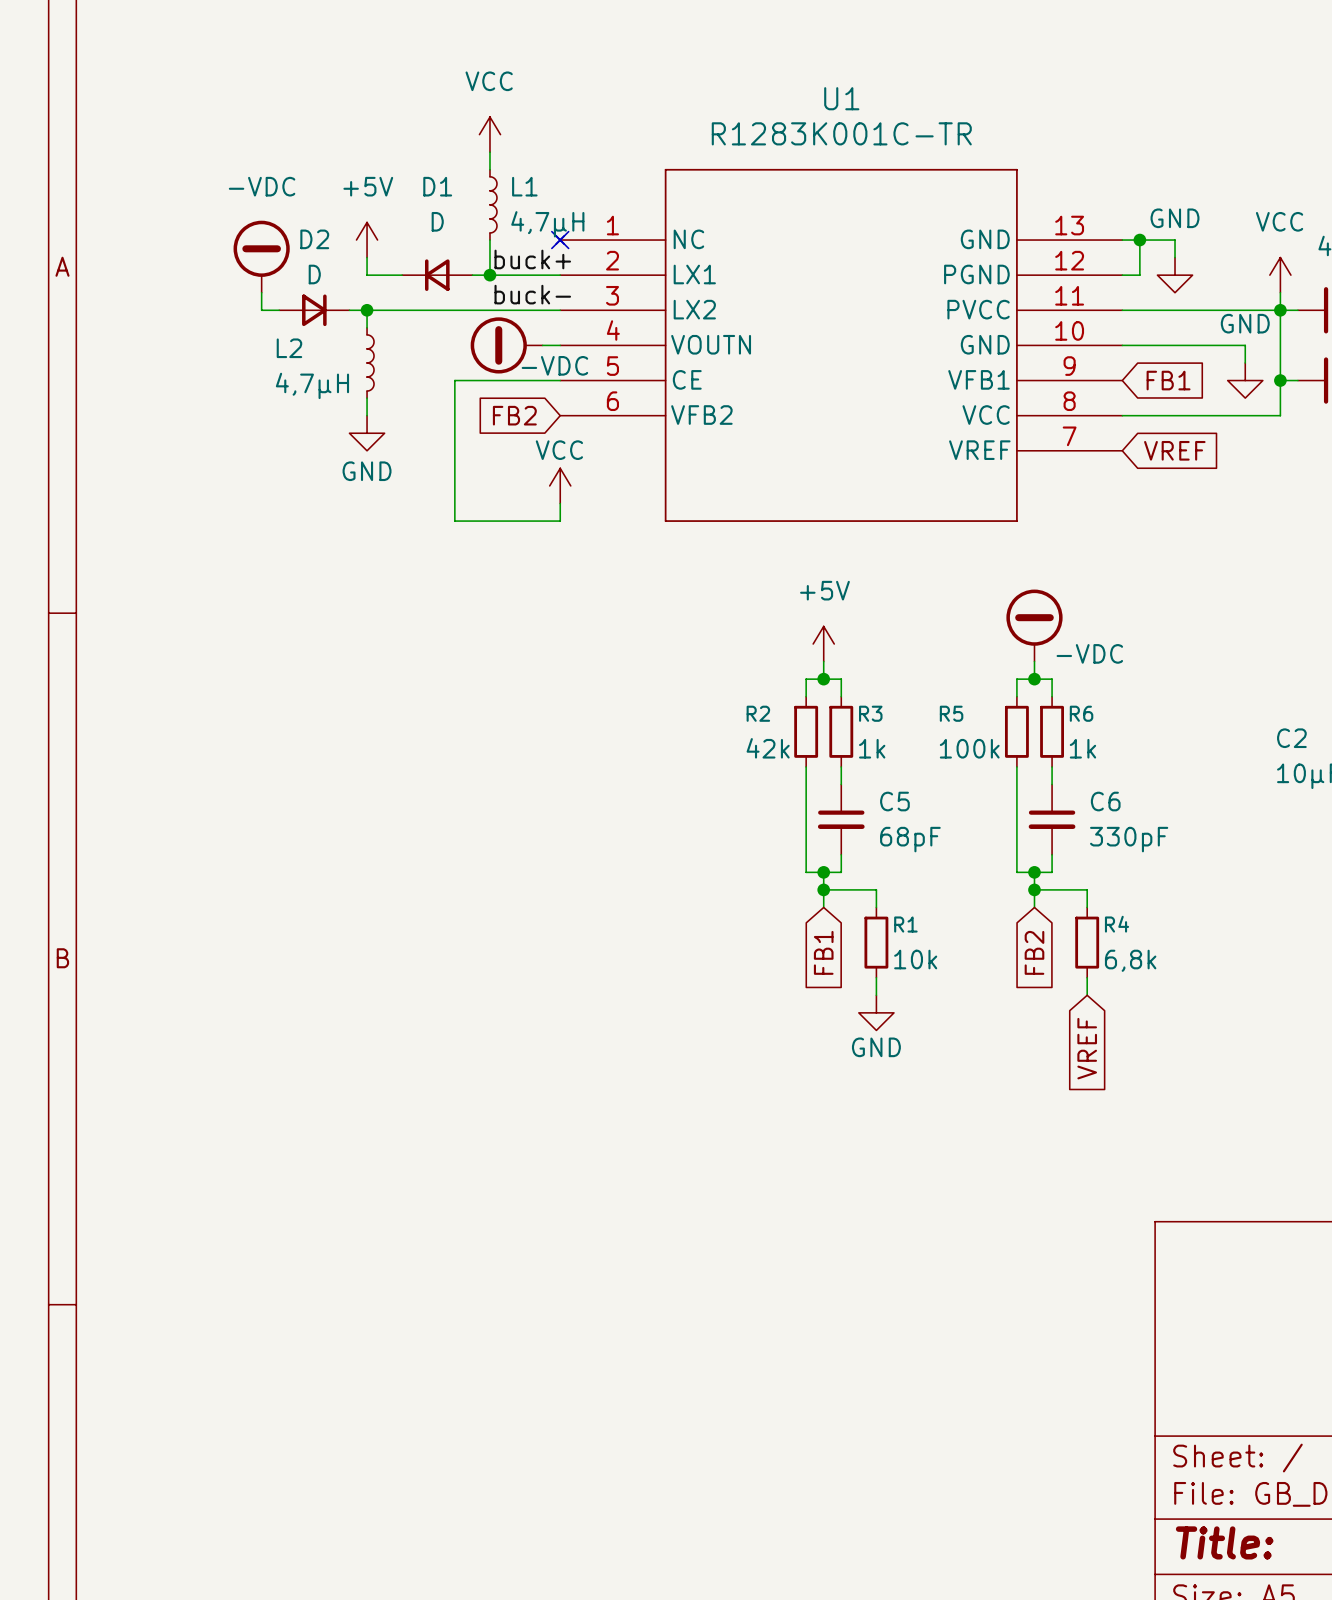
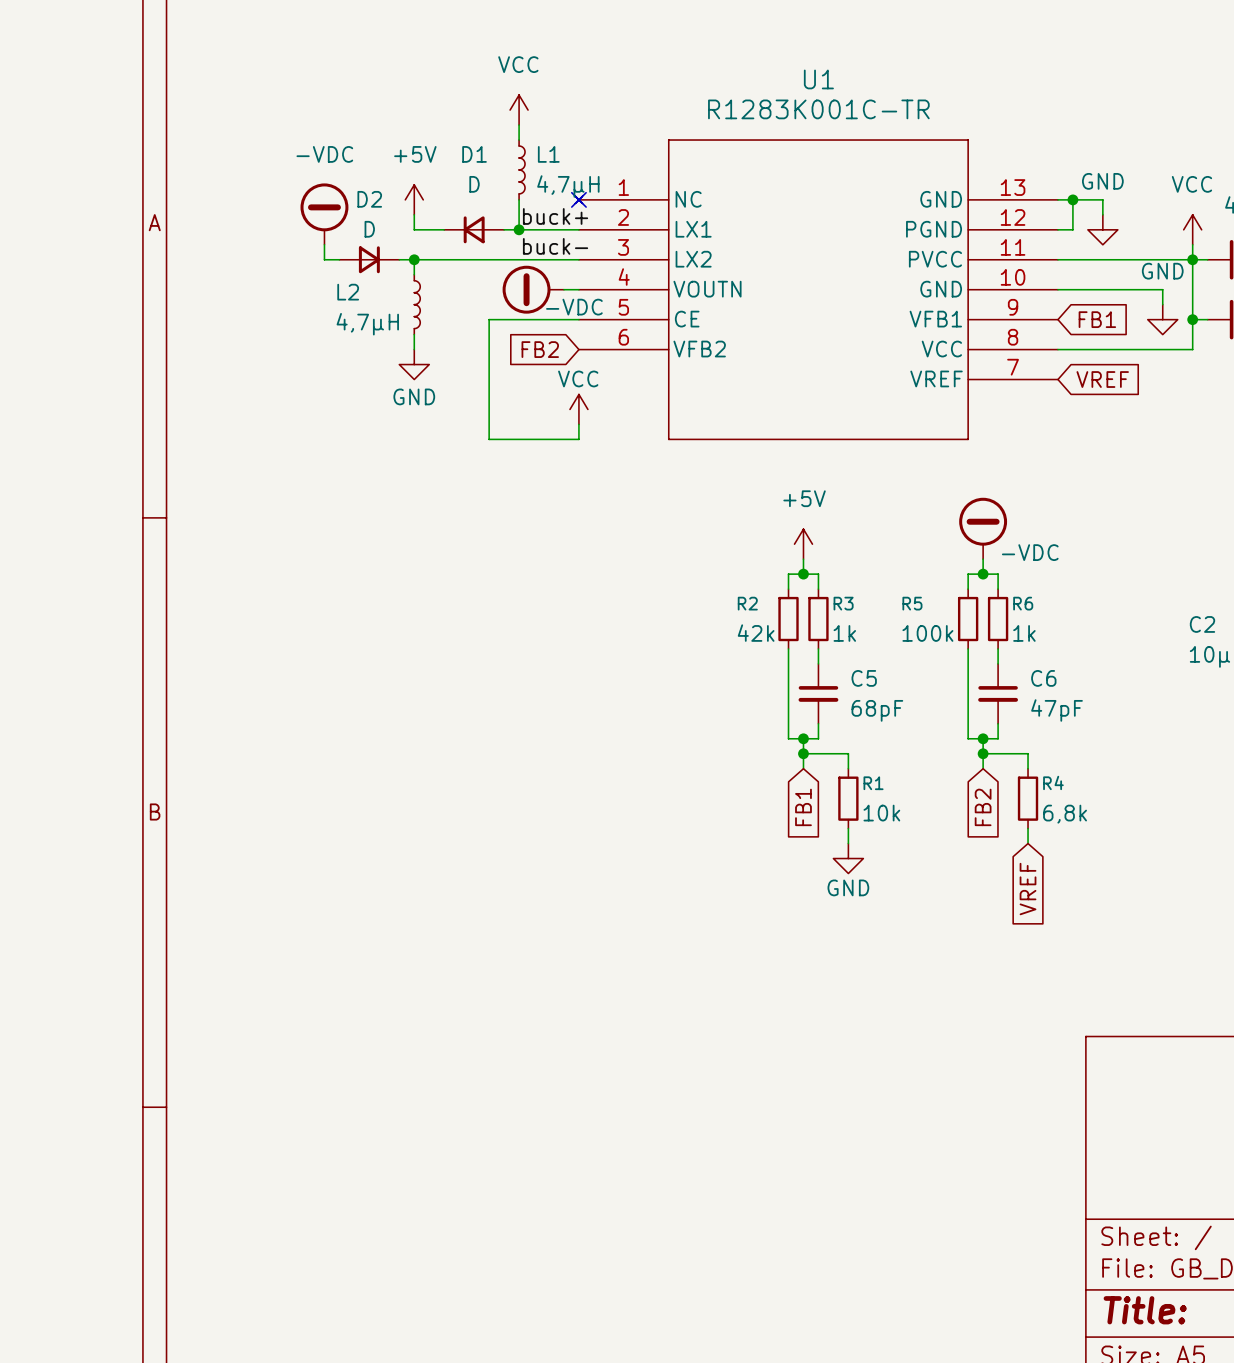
C6 value: 330pF (1129, 839) -> 47pF (1057, 710)

